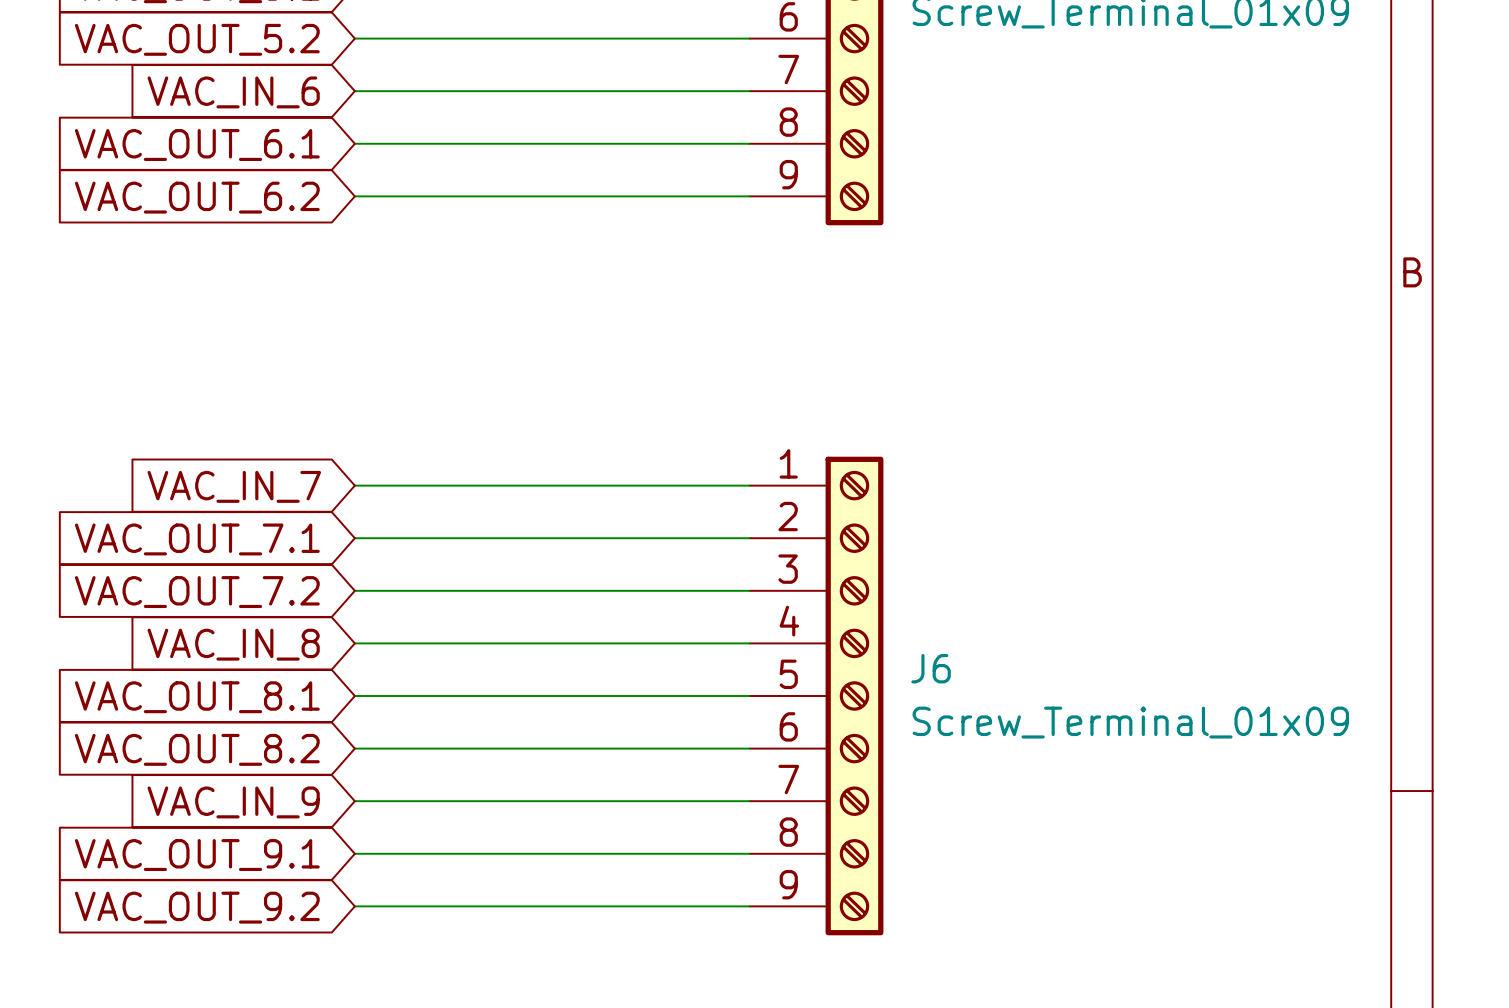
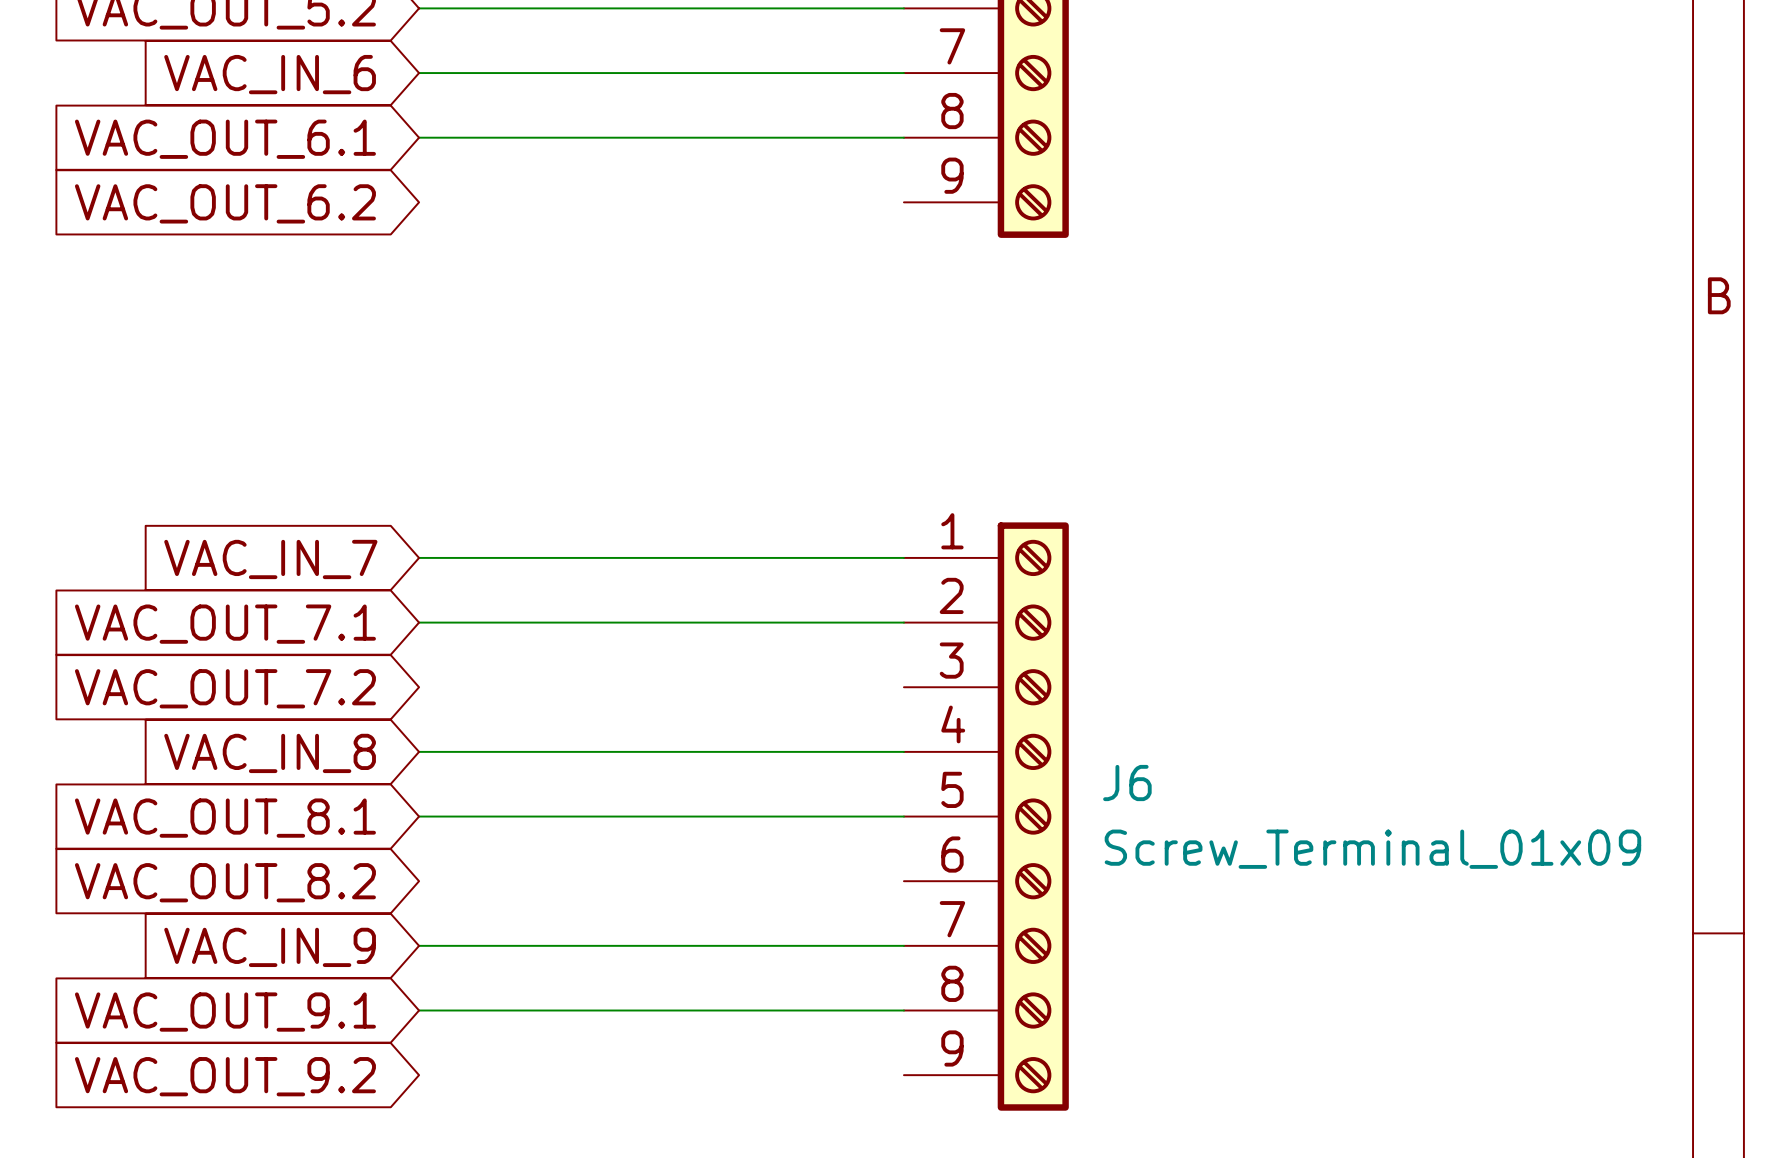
wire: (354, 196) (749, 196) -> none
wire: (354, 590) (749, 590) -> none
wire: (354, 748) (749, 748) -> none
wire: (354, 906) (749, 906) -> none

